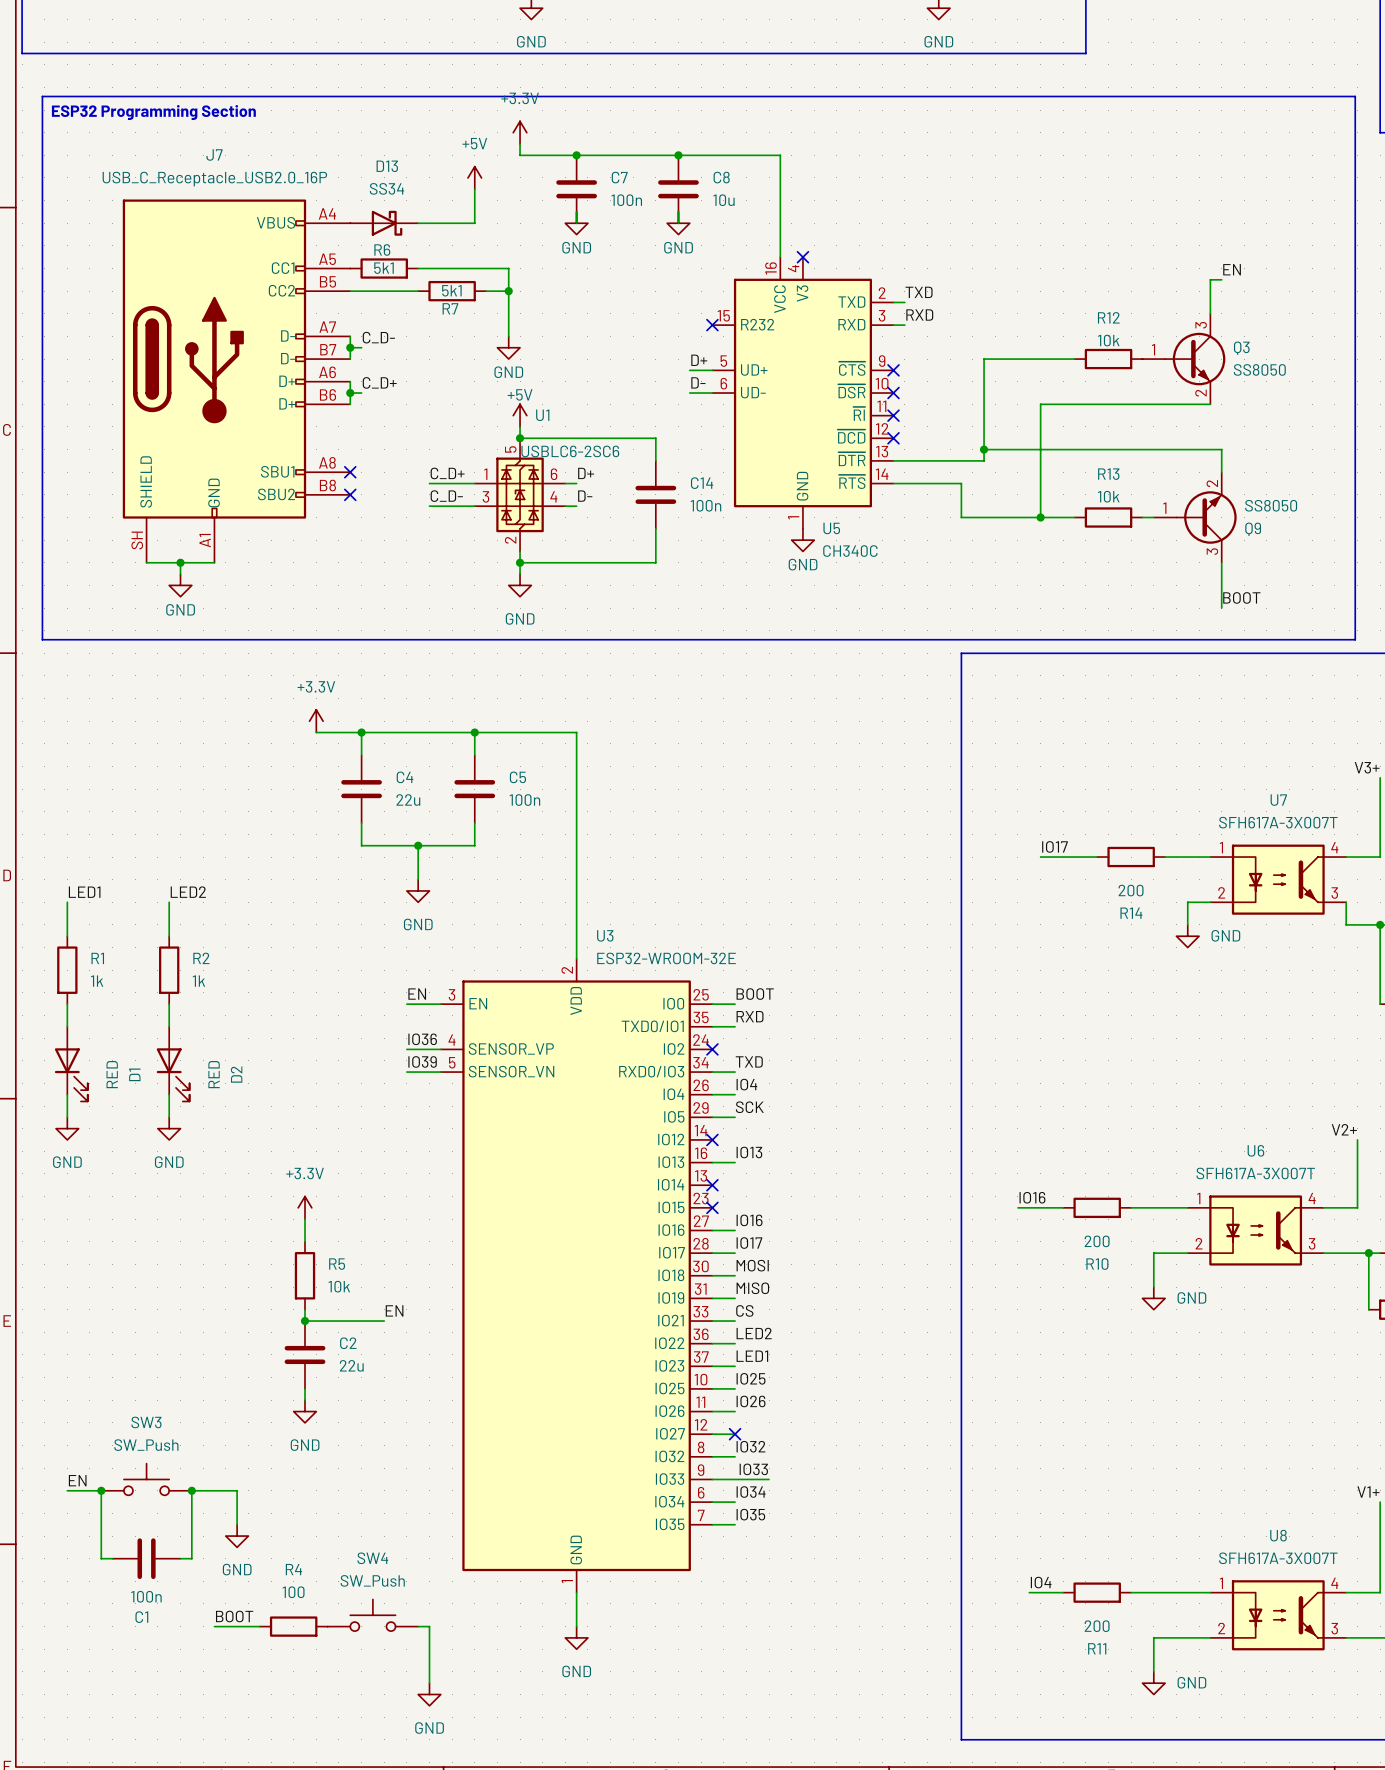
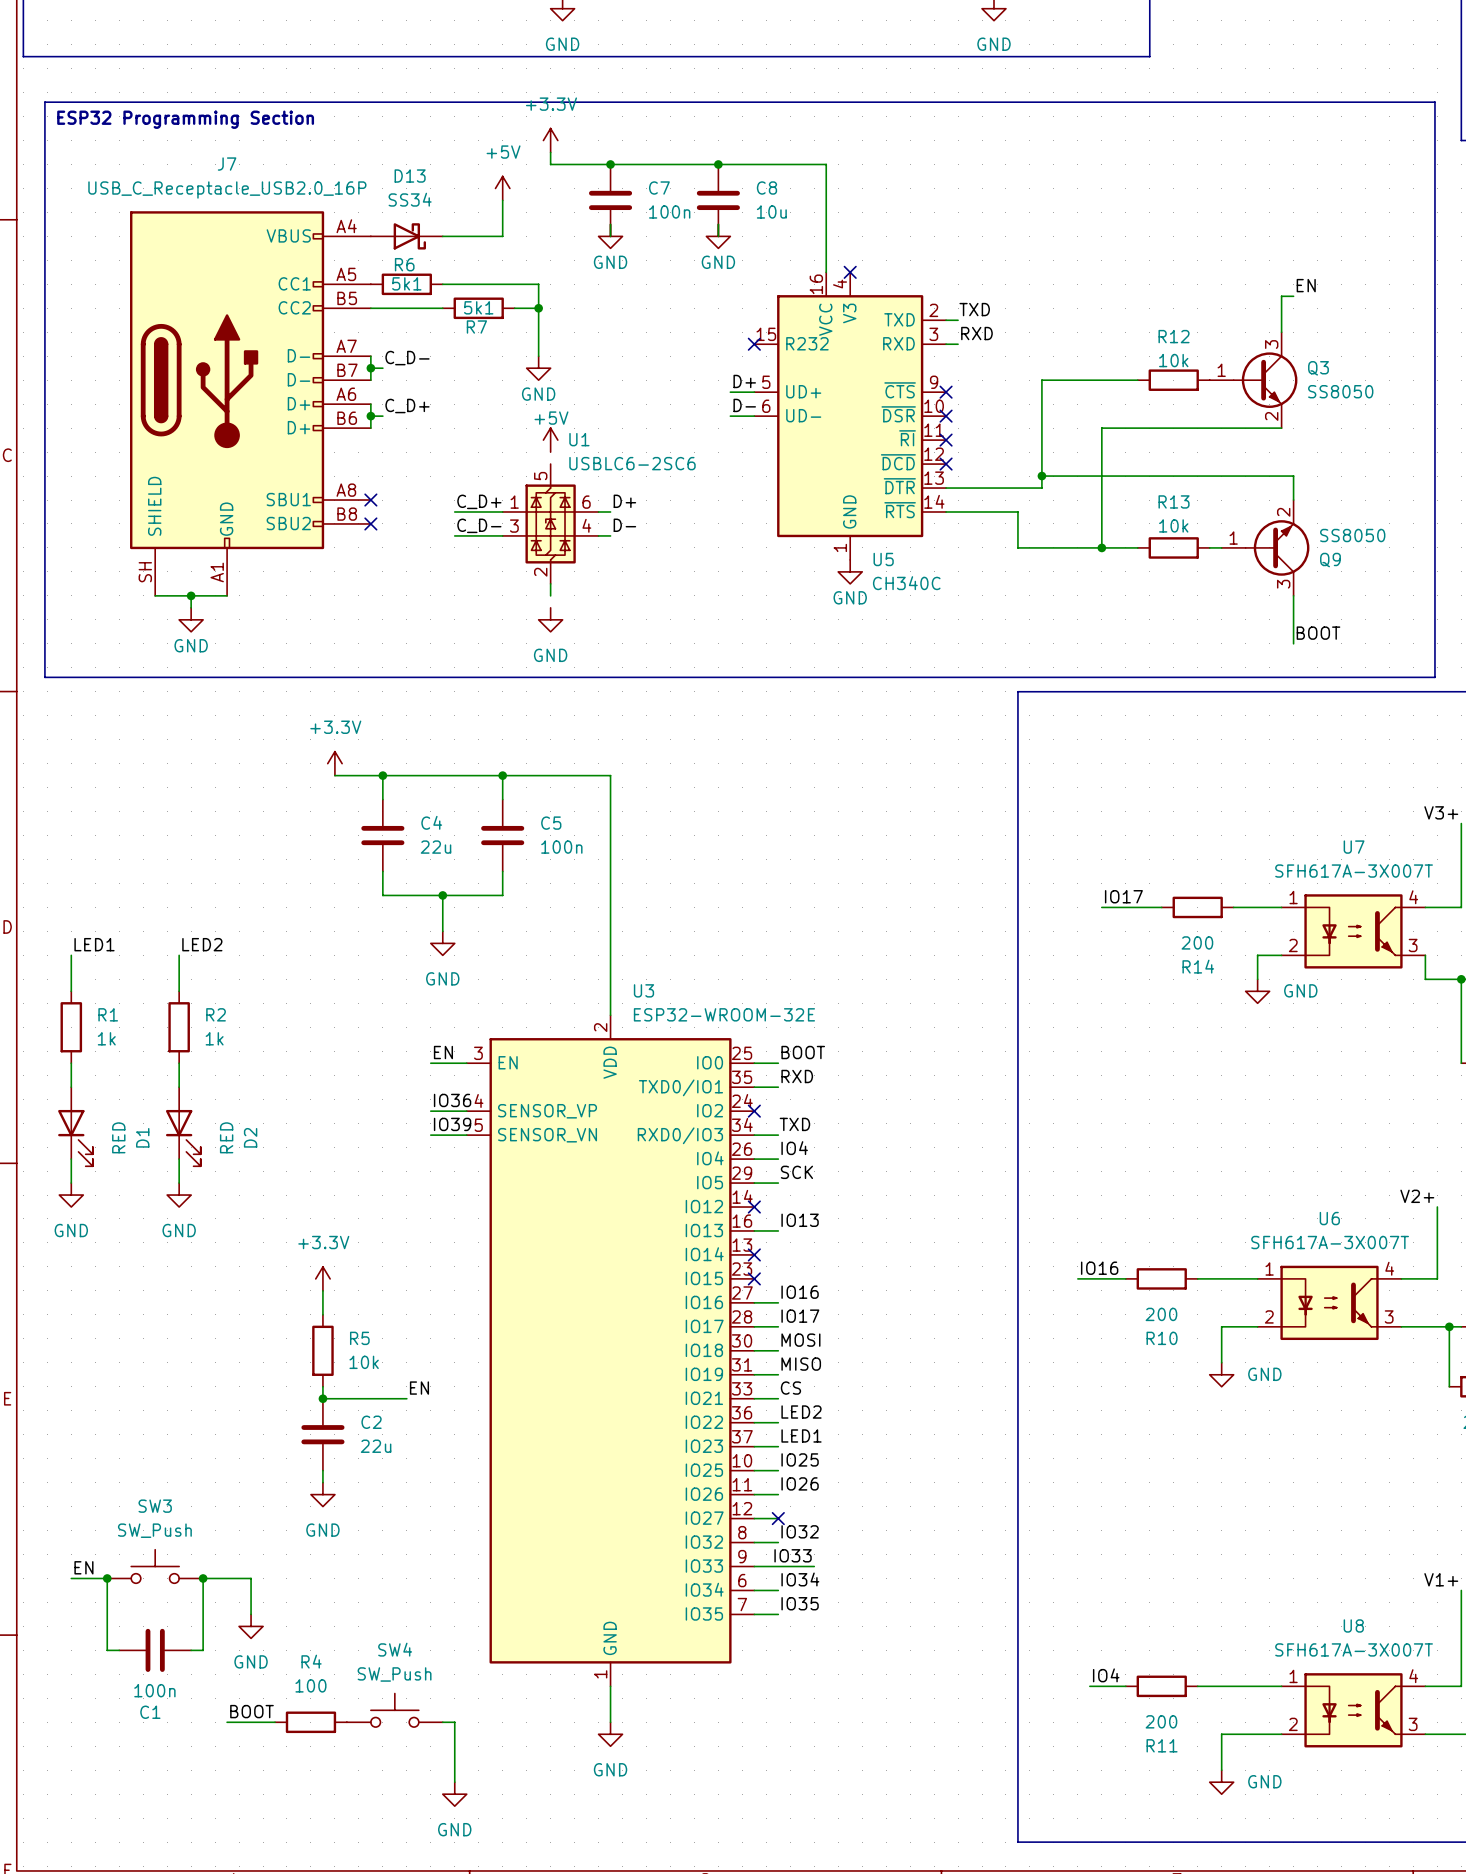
wire: (520, 426) (520, 438) (655, 438) (655, 460) -> none
junction: (520, 438) -> none
U1 value position: USBLC6-2SC6 (570, 451) -> USBLC6-2SC6 (632, 463)
C14: 100n (655, 494) -> none
wire: (655, 528) (655, 562) (520, 562) (520, 574) -> none
junction: (520, 562) -> none

